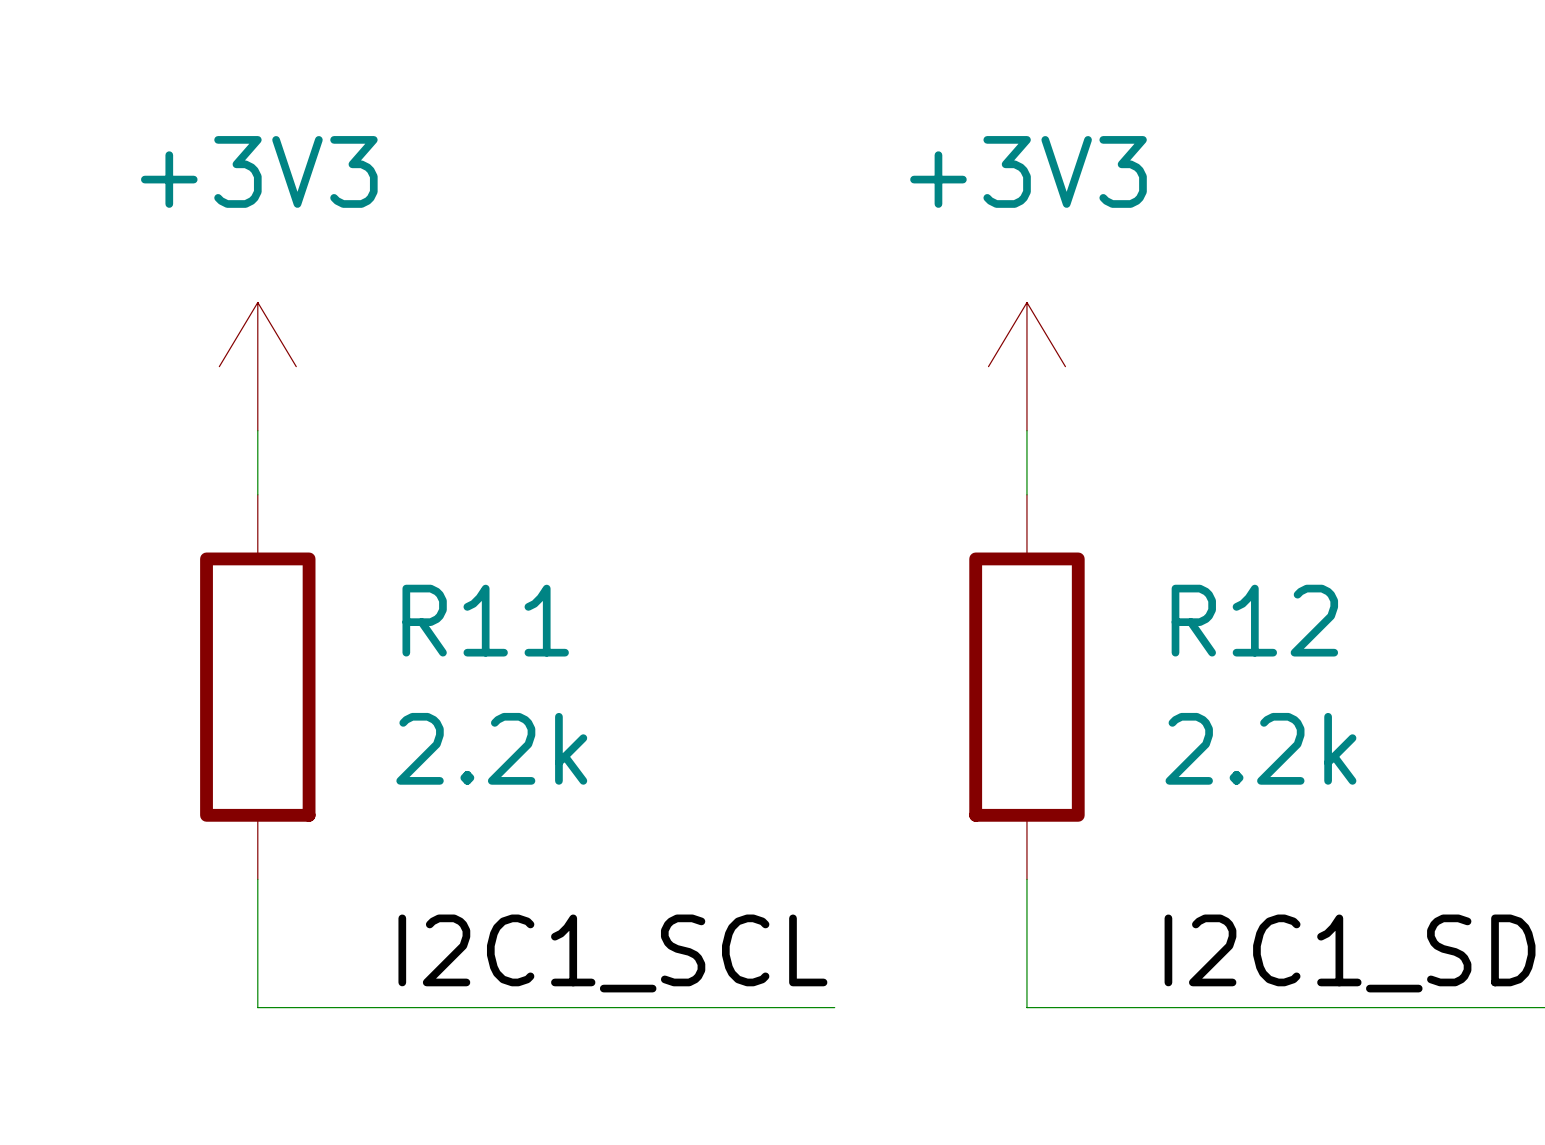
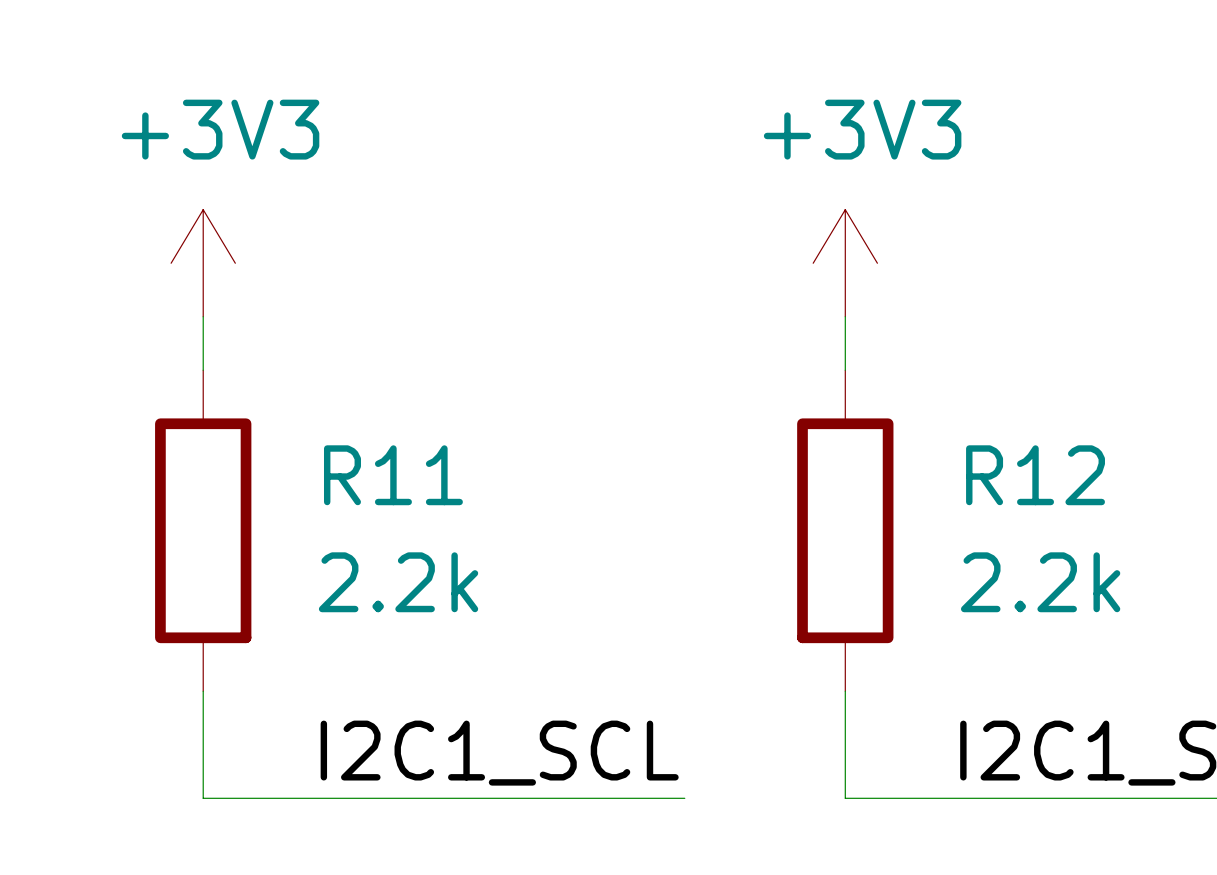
power symbol text position: +3V3 (259, 171) -> +3V3 (220, 129)
power symbol text position: +3V3 (1028, 171) -> +3V3 (862, 129)

